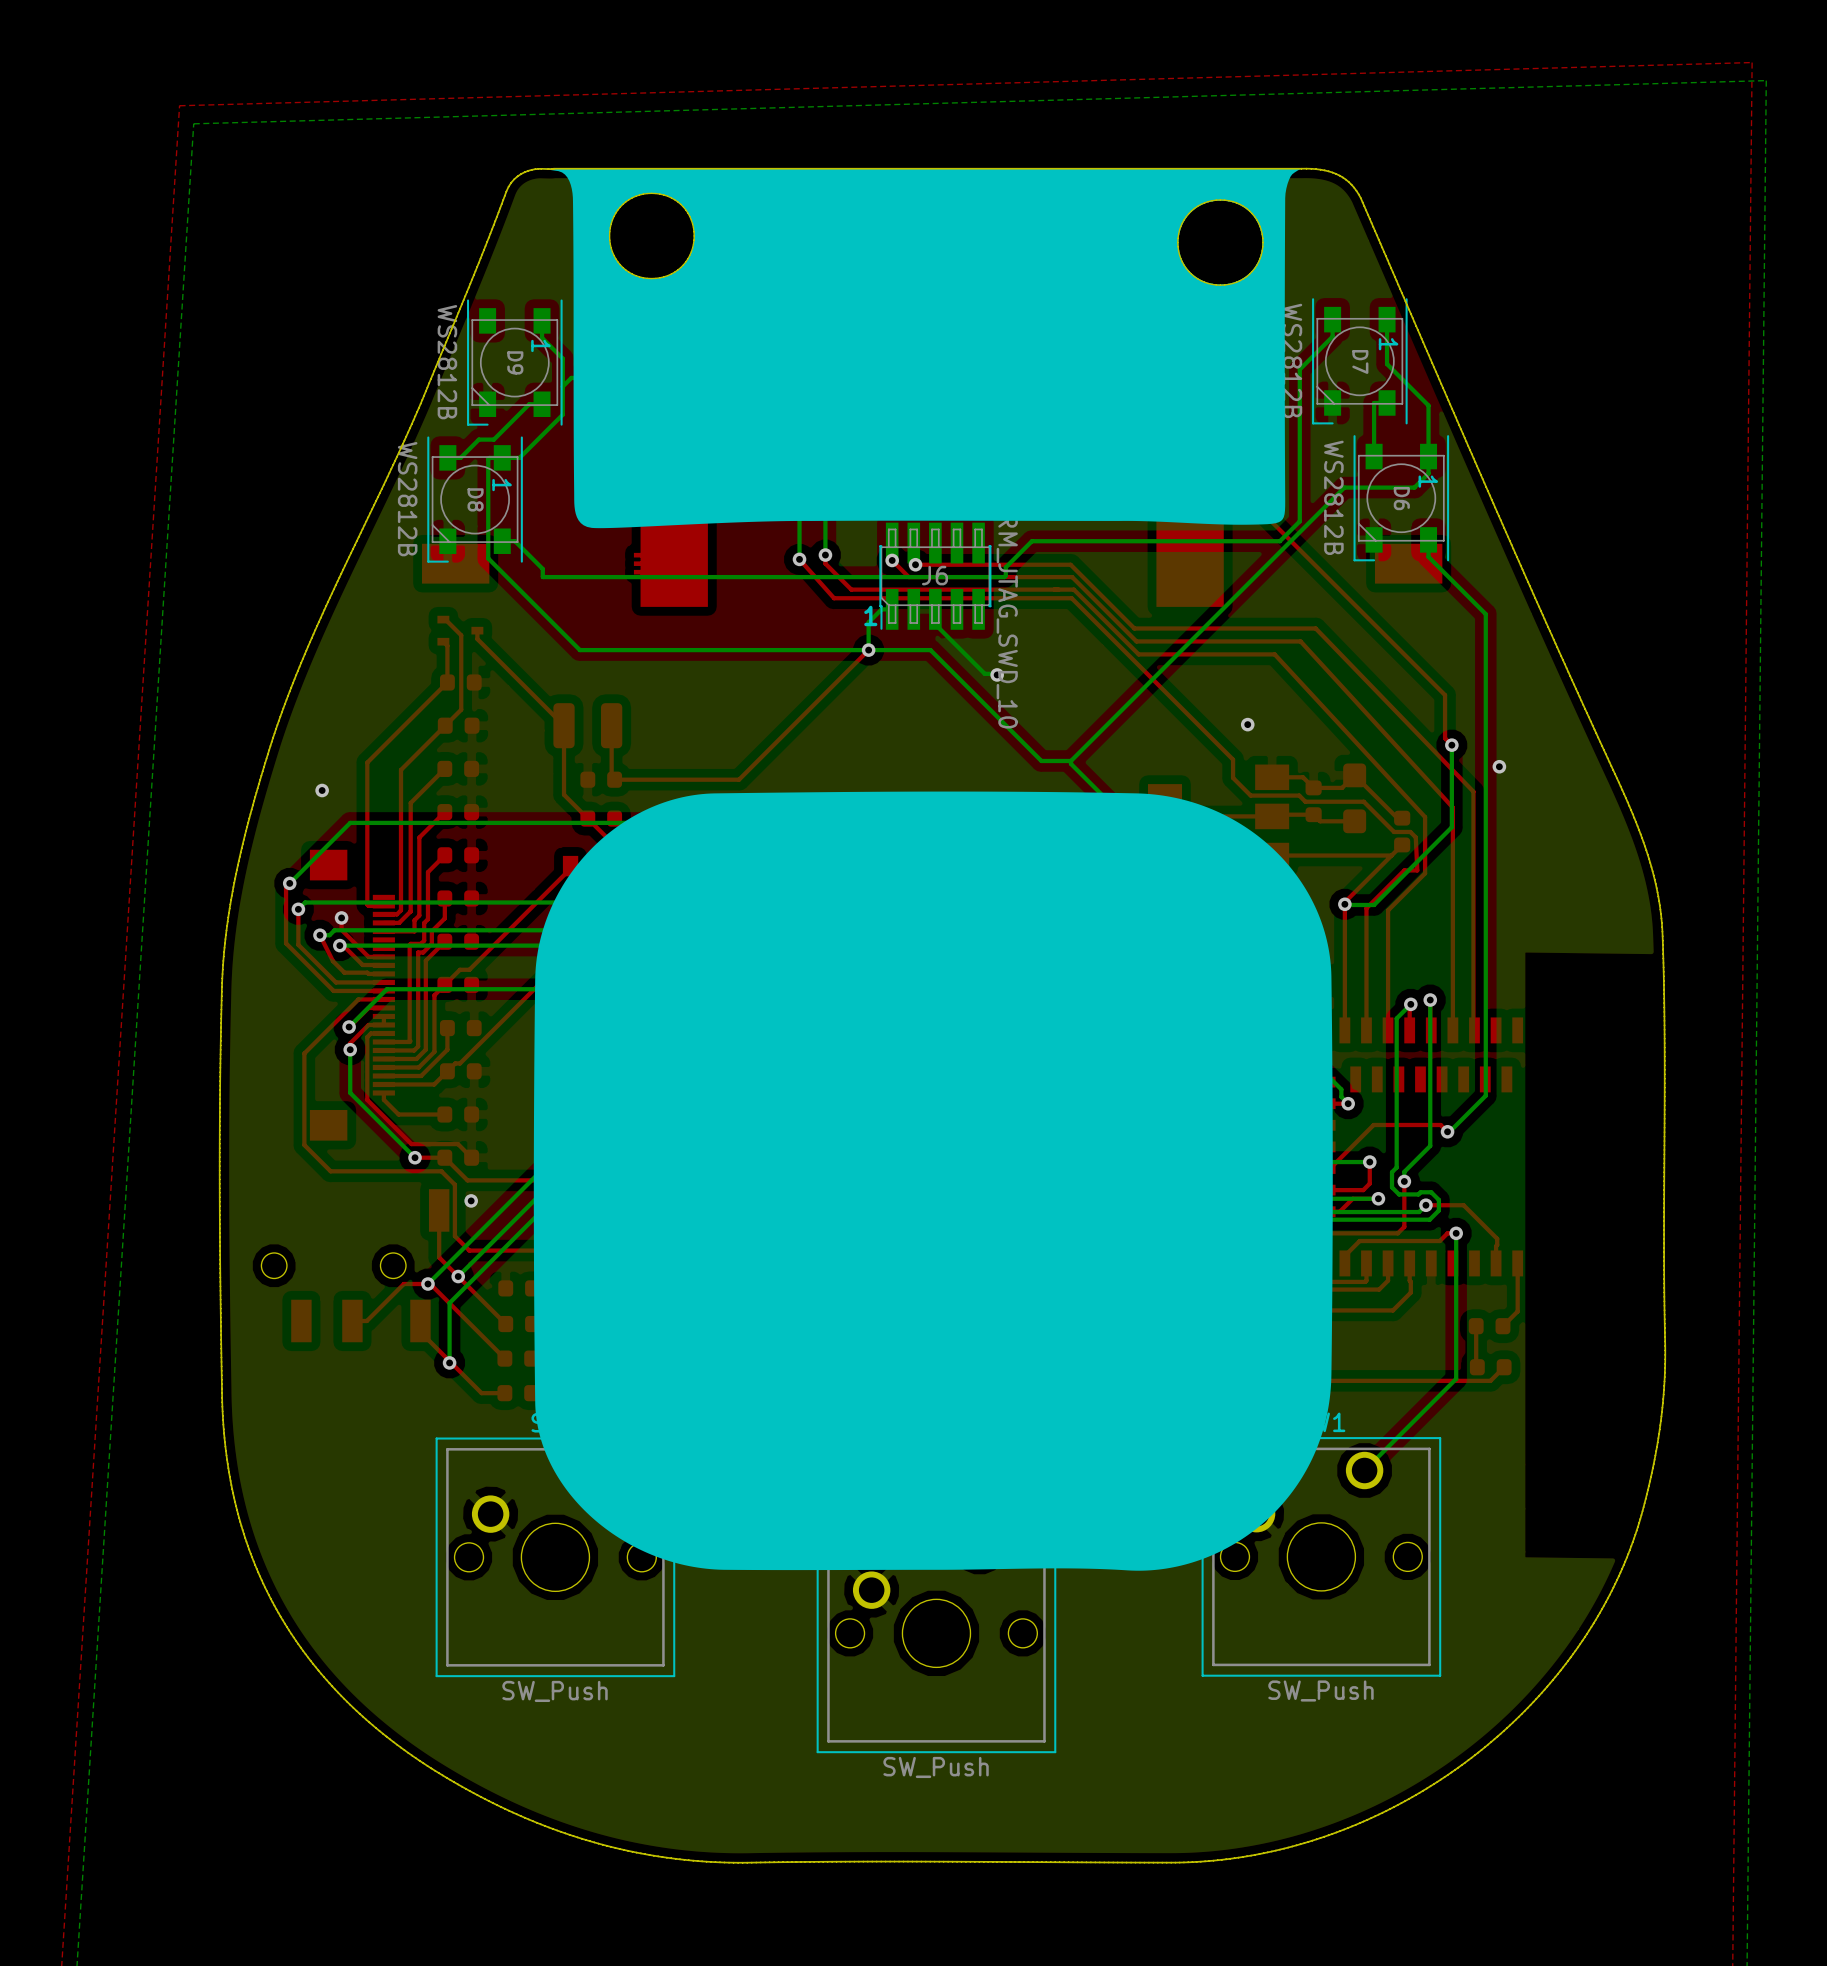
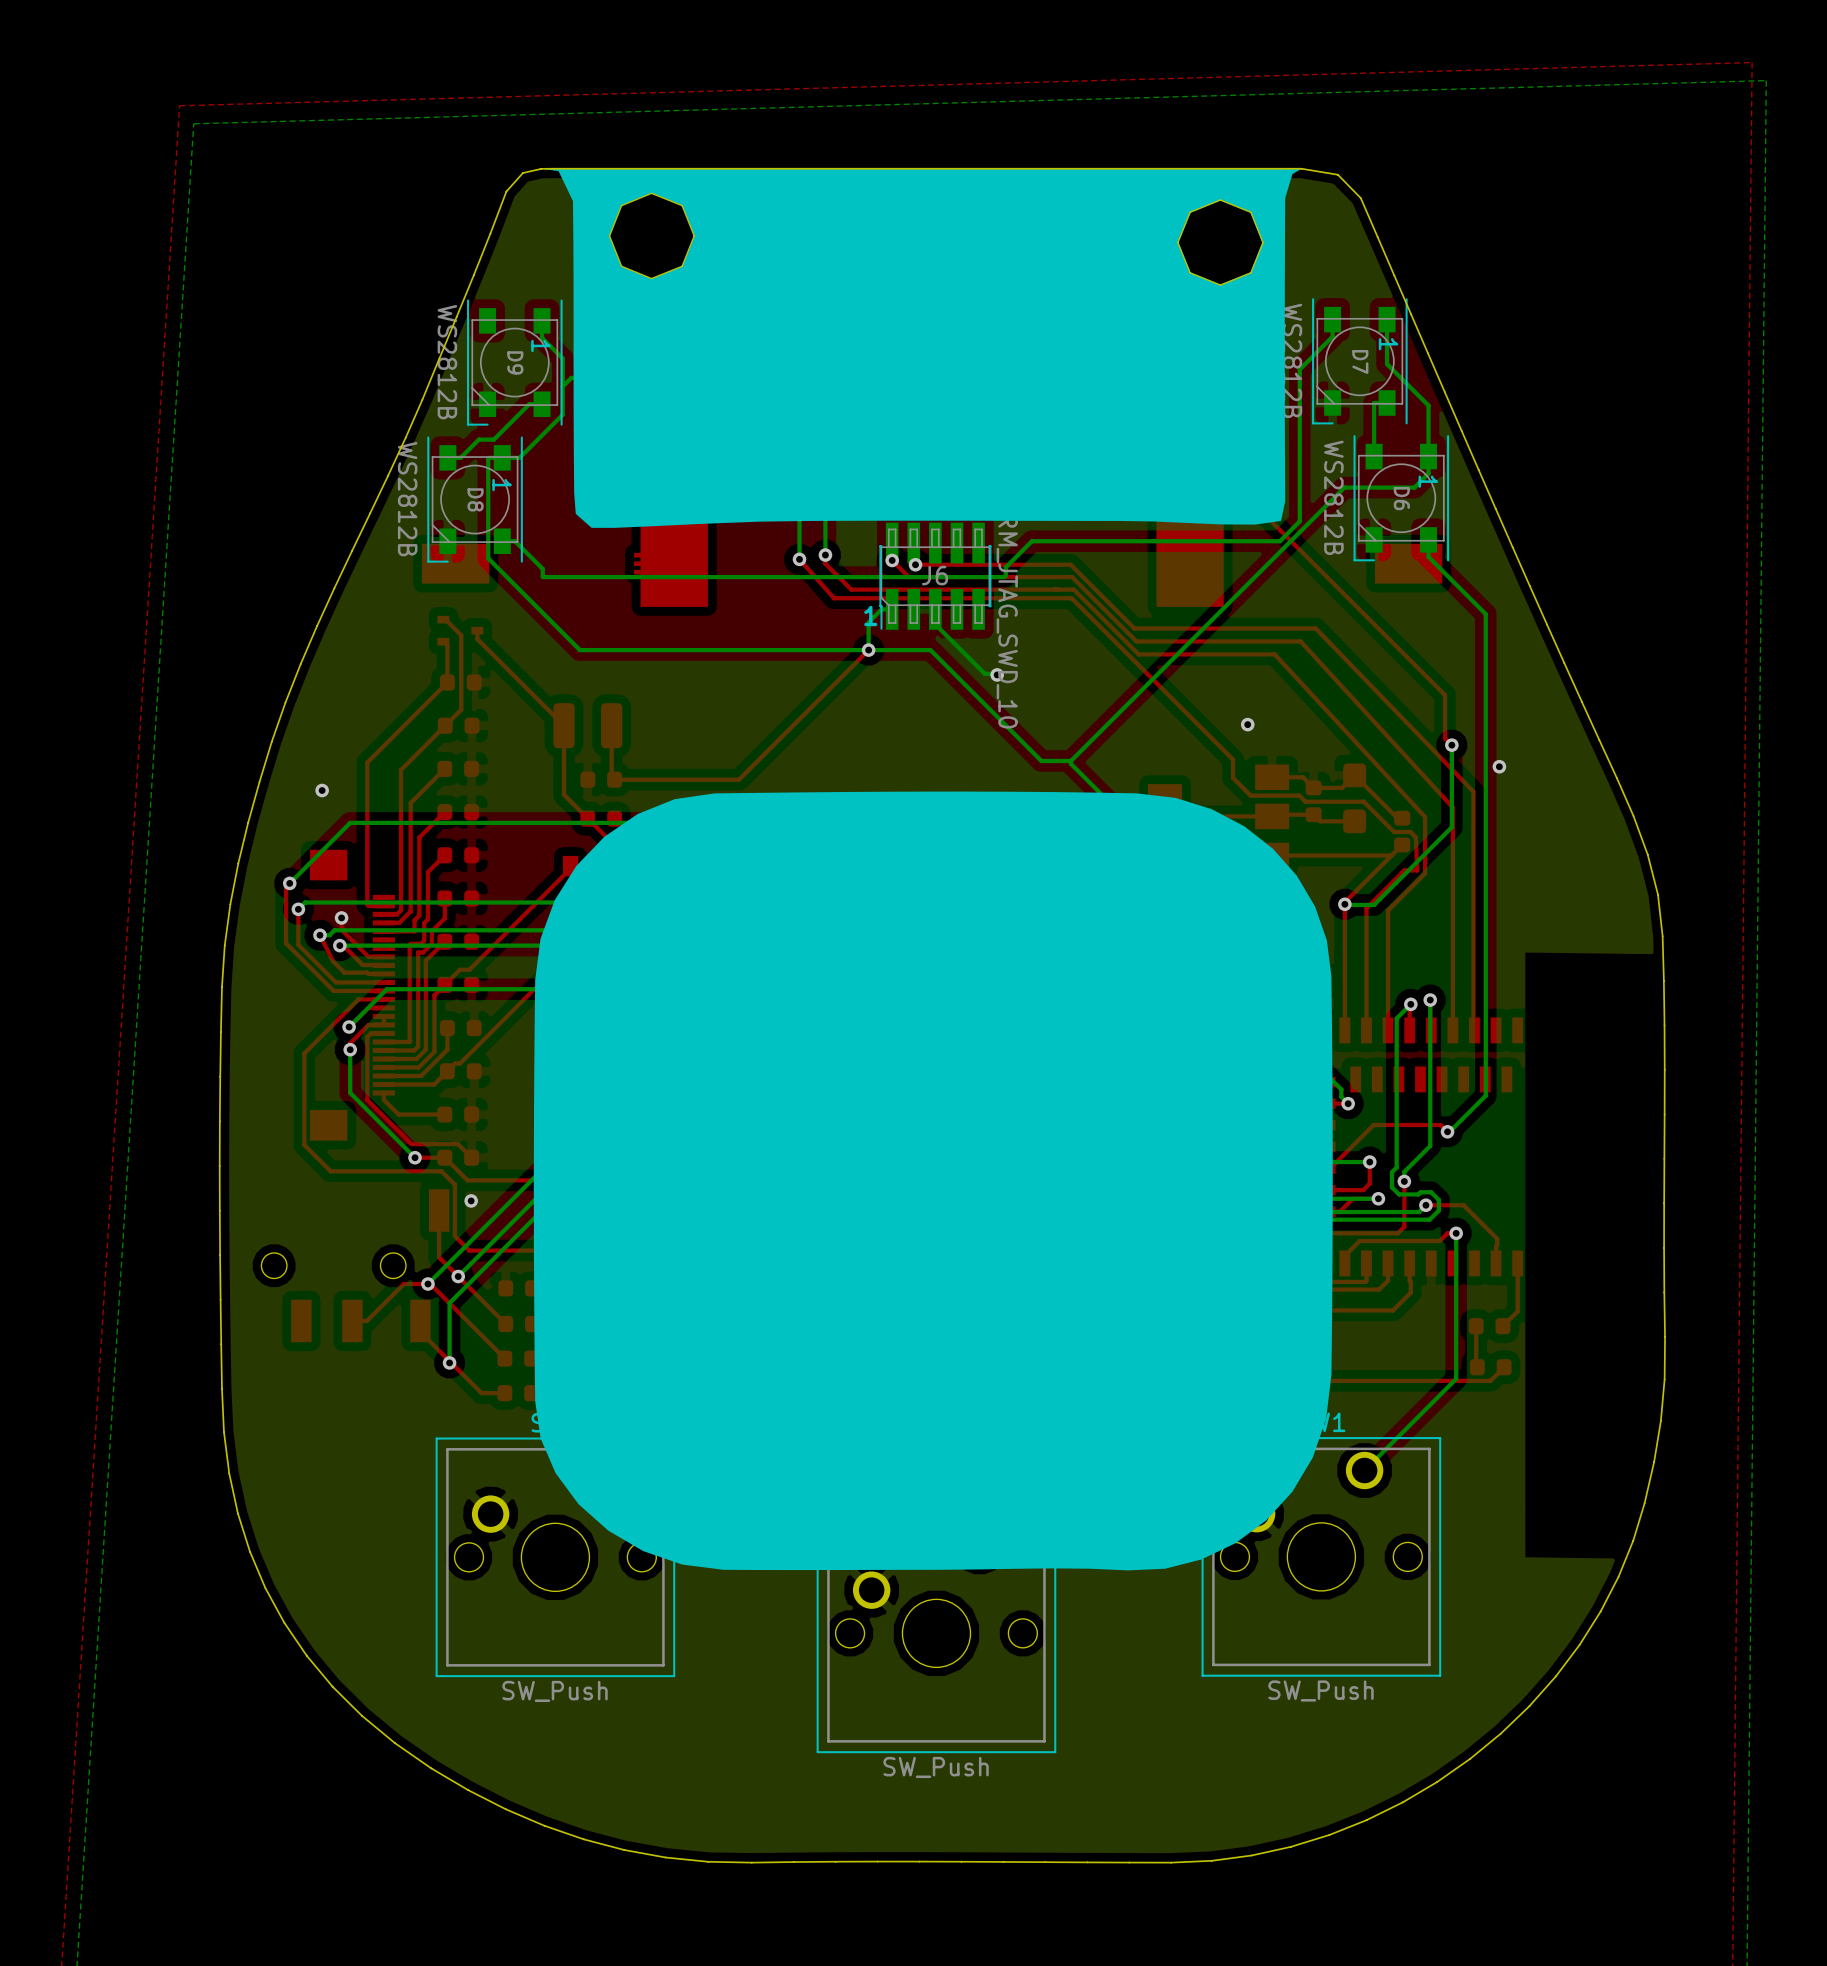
drawing shape: [218, 167, 1667, 1864] -> [218, 167, 1666, 1864]

